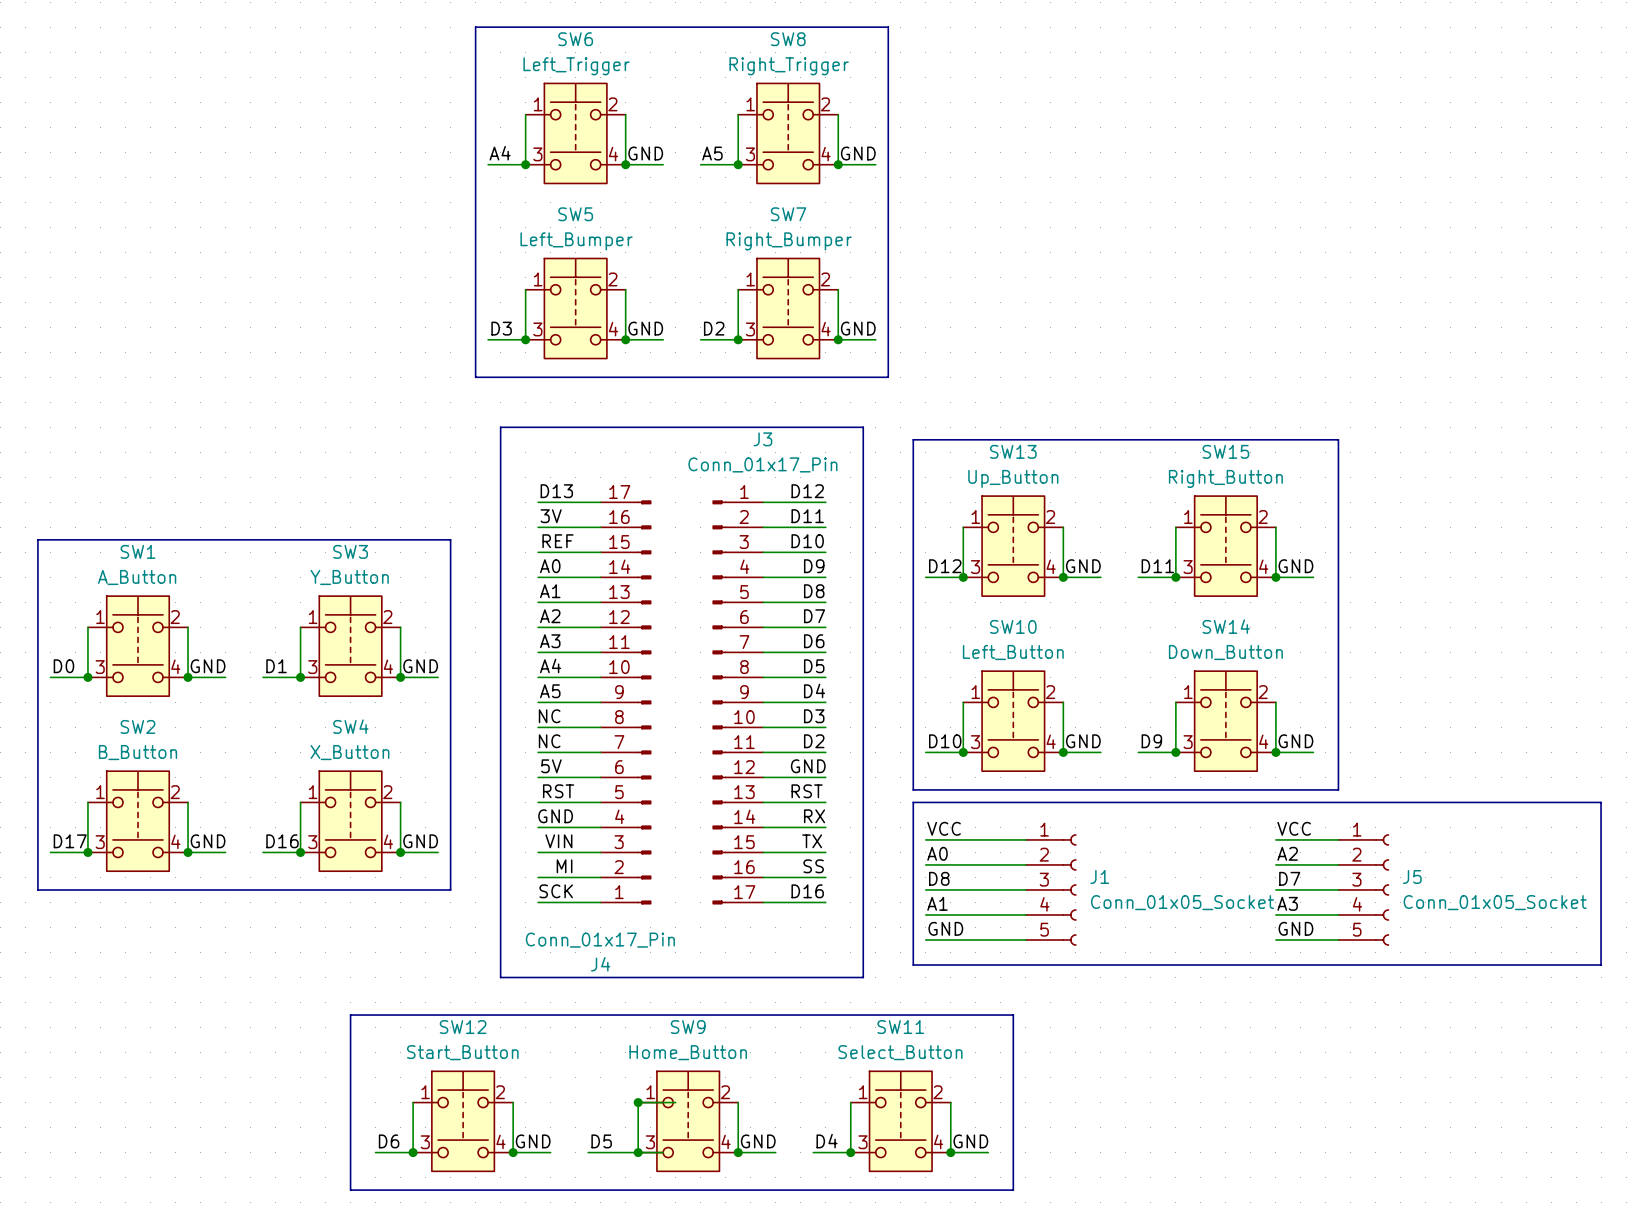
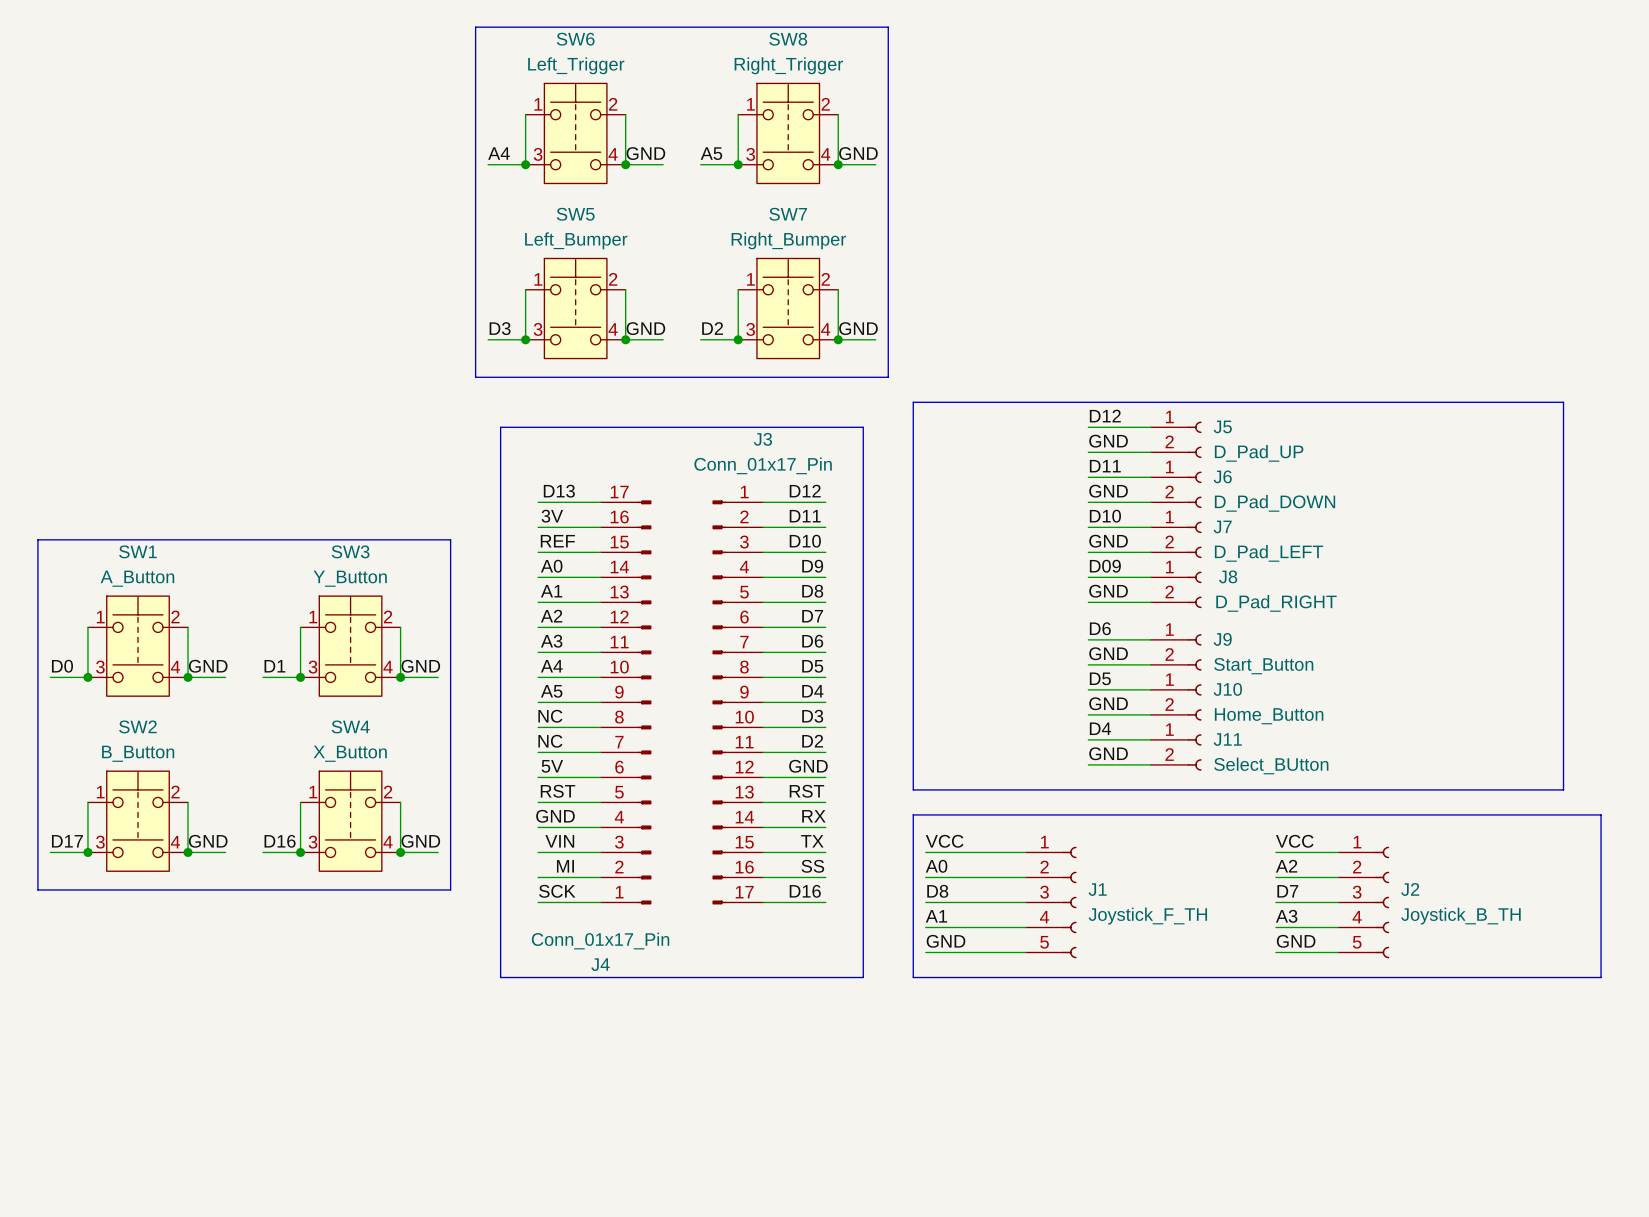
wire: none -> (1088, 427) (1150, 427)
line: (913, 439) (1338, 439) (1338, 789) -> (913, 439) (913, 402) (1563, 402) (1563, 789) (1338, 789)
label: none -> GND (1108, 441)
wire: none -> (1088, 452) (1150, 452)
wire: none -> (1088, 477) (1150, 477)
J6: none -> D_Pad_DOWN (1176, 489)
label: none -> GND (1108, 491)
wire: none -> (1088, 502) (1150, 502)
label: none -> D10 (1105, 516)
wire: (963, 527) (963, 577) (925, 577) -> none
wire: (1063, 527) (1063, 577) (1088, 577) -> none
wire: none -> (1088, 527) (1150, 527)
wire: (1175, 527) (1175, 577) (1150, 577) -> none
wire: (1275, 527) (1275, 577) (1313, 577) -> none
J7: none -> D_Pad_LEFT (1176, 539)
label: none -> GND (1108, 541)
SW13: Up_Button (1013, 546) -> none
SW15: Right_Button (1225, 546) -> none
wire: none -> (1088, 552) (1150, 552)
label position: D12 (945, 566) -> D12 (1105, 416)
label: GND (1083, 566) -> none
label: none -> D09 (1105, 566)
label position: D11 (1157, 566) -> D11 (1105, 466)
label: GND (1295, 566) -> none
junction: (963, 577) -> none
junction: (1063, 577) -> none
wire: none -> (1100, 577) (1138, 577)
junction: (1175, 577) -> none
junction: (1275, 577) -> none
J8: none -> D_Pad_RIGHT (1176, 589)
label: none -> GND (1108, 591)
wire: none -> (1088, 602) (1150, 602)
label: none -> D6 (1100, 628)
wire: none -> (1088, 639) (1150, 639)
J9: none -> Start_Button (1176, 652)
label: none -> GND (1108, 653)
wire: none -> (1088, 664) (1150, 664)
label: none -> D5 (1100, 678)
wire: none -> (1088, 689) (1150, 689)
wire: (963, 702) (963, 752) (925, 752) -> none
wire: (1063, 702) (1063, 752) (1100, 752) -> none
wire: (1175, 702) (1175, 752) (1138, 752) -> none
J10: none -> Home_Button (1176, 702)
wire: (1275, 702) (1275, 752) (1313, 752) -> none
label: none -> GND (1108, 703)
wire: none -> (1088, 714) (1150, 714)
SW10: Left_Button (1013, 721) -> none
SW14: Down_Button (1225, 721) -> none
label: none -> D4 (1100, 728)
wire: none -> (1088, 739) (1150, 739)
label: D10 (945, 741) -> none
label position: GND (1083, 741) -> GND (1108, 753)
label: D9 (1151, 741) -> none
label: GND (1295, 741) -> none
junction: (963, 752) -> none
junction: (1063, 752) -> none
junction: (1175, 752) -> none
J11: none -> Select_BUtton (1176, 752)
junction: (1275, 752) -> none
wire: none -> (1088, 764) (1150, 764)
line: (913, 814) (913, 802) (1601, 802) (1601, 814) -> (913, 814) (1601, 814)
label position: VCC (944, 828) -> VCC (944, 841)
label position: VCC (1294, 828) -> VCC (1294, 841)
J5 symbol: [1338, 834, 1390, 946] -> [1150, 421, 1202, 459]
wire: (925, 839) (1025, 839) -> (925, 852) (1025, 852)
wire: (1275, 839) (1338, 839) -> (1275, 852) (1338, 852)
label position: A0 (937, 853) -> A0 (936, 866)
label position: A2 (1287, 853) -> A2 (1286, 866)
wire: (925, 864) (1025, 864) -> (925, 877) (1025, 877)
wire: (1275, 864) (1338, 864) -> (1275, 877) (1338, 877)
label position: D8 (939, 878) -> D8 (937, 891)
label position: D7 (1289, 878) -> D7 (1287, 891)
wire: (925, 889) (1025, 889) -> (925, 902) (1025, 902)
J1 position: (1051, 889) -> (1051, 902)
wire: (1275, 889) (1338, 889) -> (1275, 902) (1338, 902)
J1 value: Conn_01x05_Socket (1182, 902) -> Joystick_F_TH (1147, 916)
J2: none -> Joystick_B_TH (1363, 902)
J5 value: Conn_01x05_Socket (1495, 902) -> D_Pad_UP (1259, 453)
label position: A1 (937, 903) -> A1 (936, 916)
label position: A3 (1287, 903) -> A3 (1286, 916)
wire: (925, 914) (1025, 914) -> (925, 927) (1025, 927)
wire: (1275, 914) (1338, 914) -> (1275, 927) (1338, 927)
label position: GND (945, 928) -> GND (946, 941)
label position: GND (1295, 928) -> GND (1296, 941)
wire: (925, 940) (1025, 940) -> (925, 952) (1025, 952)
wire: (1275, 940) (1338, 940) -> (1275, 952) (1338, 952)
line: (913, 965) (1601, 965) -> (913, 965) (913, 977) (1601, 977) (1601, 965)
line: (350, 1015) (1013, 1015) (1013, 1190) (350, 1190) (350, 1015) -> none
wire: (413, 1102) (413, 1152) (375, 1152) -> none
wire: (513, 1102) (513, 1152) (550, 1152) -> none
junction: (638, 1102) -> none
wire: (675, 1102) (638, 1102) (638, 1152) -> none
wire: (738, 1102) (738, 1152) (775, 1152) -> none
wire: (850, 1102) (850, 1152) (813, 1152) -> none
wire: (950, 1102) (950, 1152) (988, 1152) -> none
SW12: Start_Button (463, 1121) -> none
SW9: Home_Button (688, 1121) -> none
SW11: Select_Button (900, 1121) -> none
label: D6 (389, 1141) -> none
label: GND (533, 1141) -> none
label: D5 (601, 1141) -> none
label: GND (758, 1141) -> none
label: D4 (827, 1141) -> none
label: GND (970, 1141) -> none
junction: (413, 1152) -> none
junction: (513, 1152) -> none
wire: (588, 1152) (663, 1152) -> none
junction: (638, 1152) -> none
junction: (738, 1152) -> none
junction: (850, 1152) -> none
junction: (950, 1152) -> none

